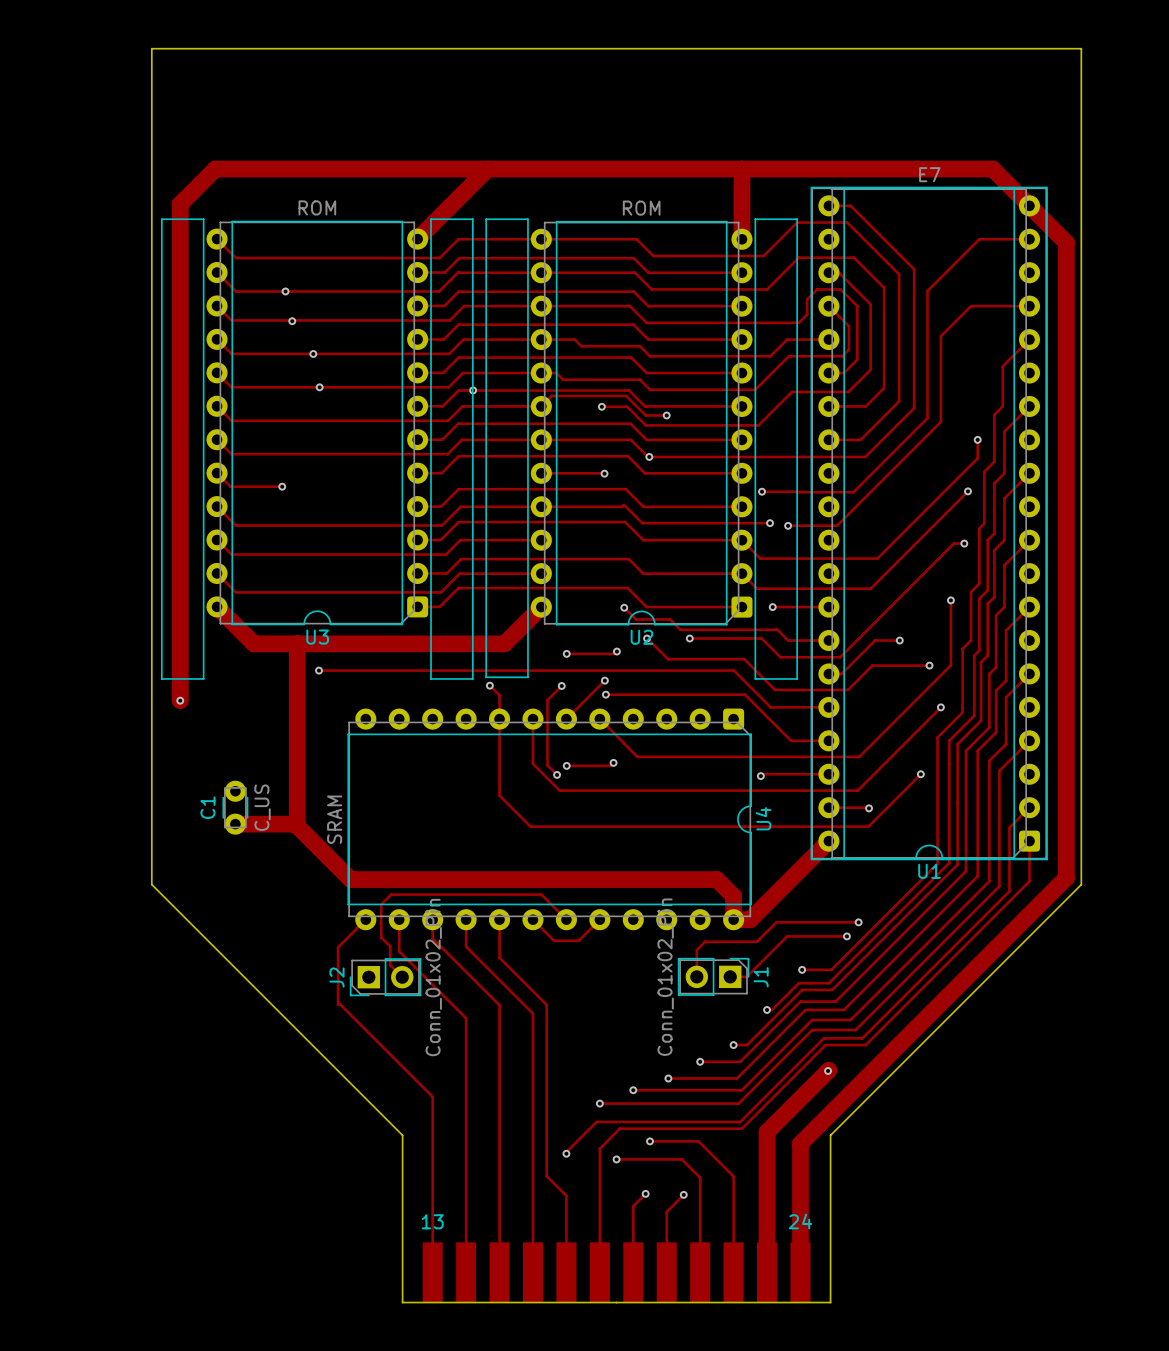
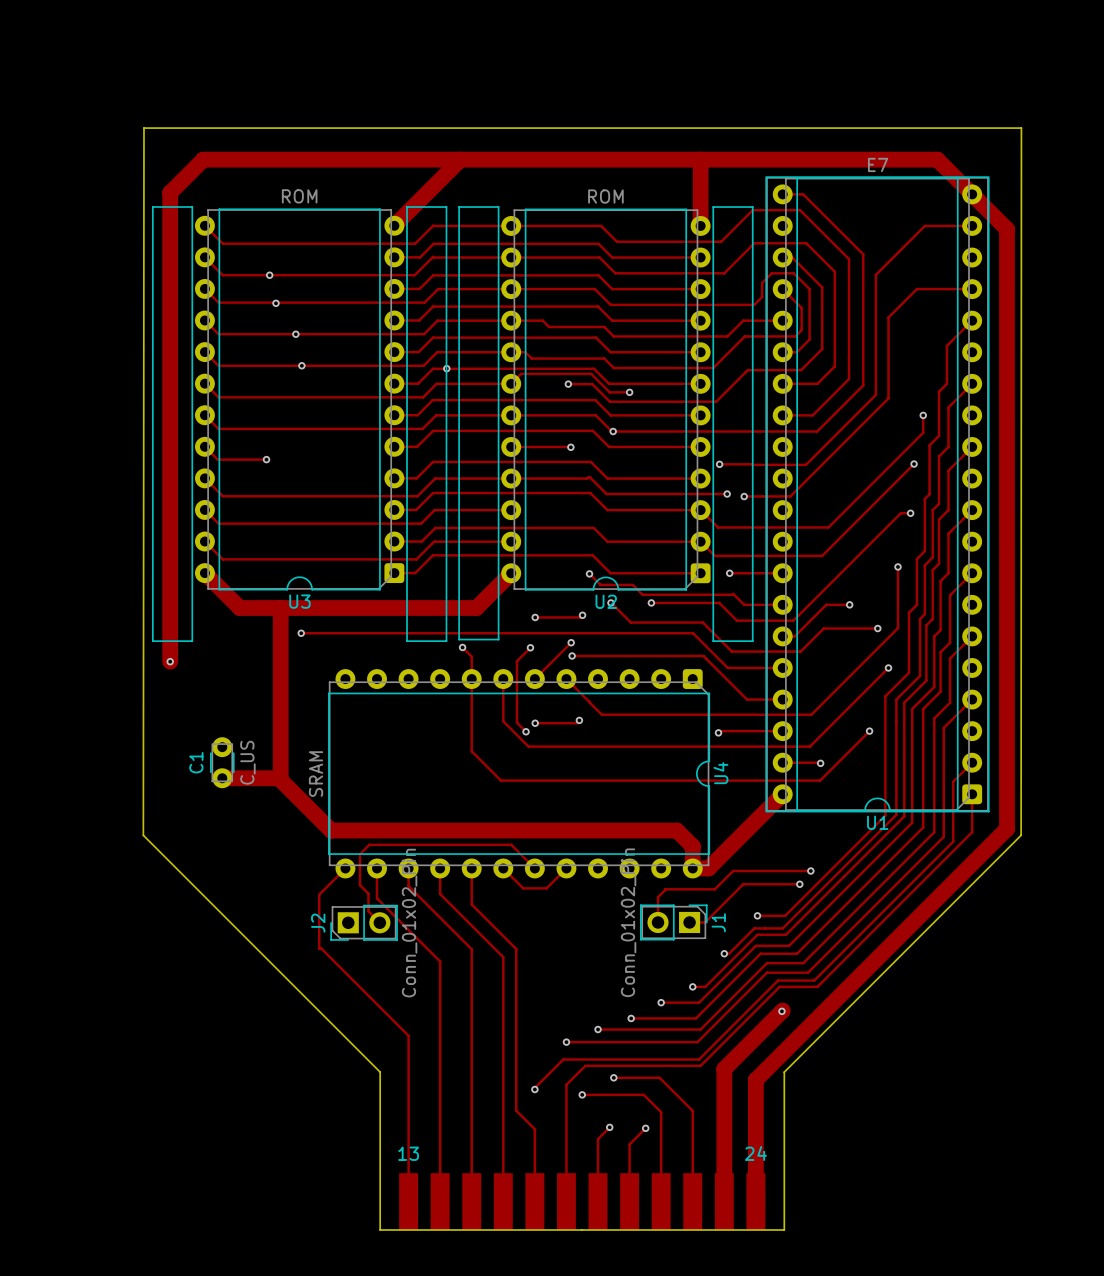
board edge: (151, 884) (151, 48) (1081, 48) (1081, 884) -> (143, 835) (144, 128) (1021, 128) (1021, 835)

